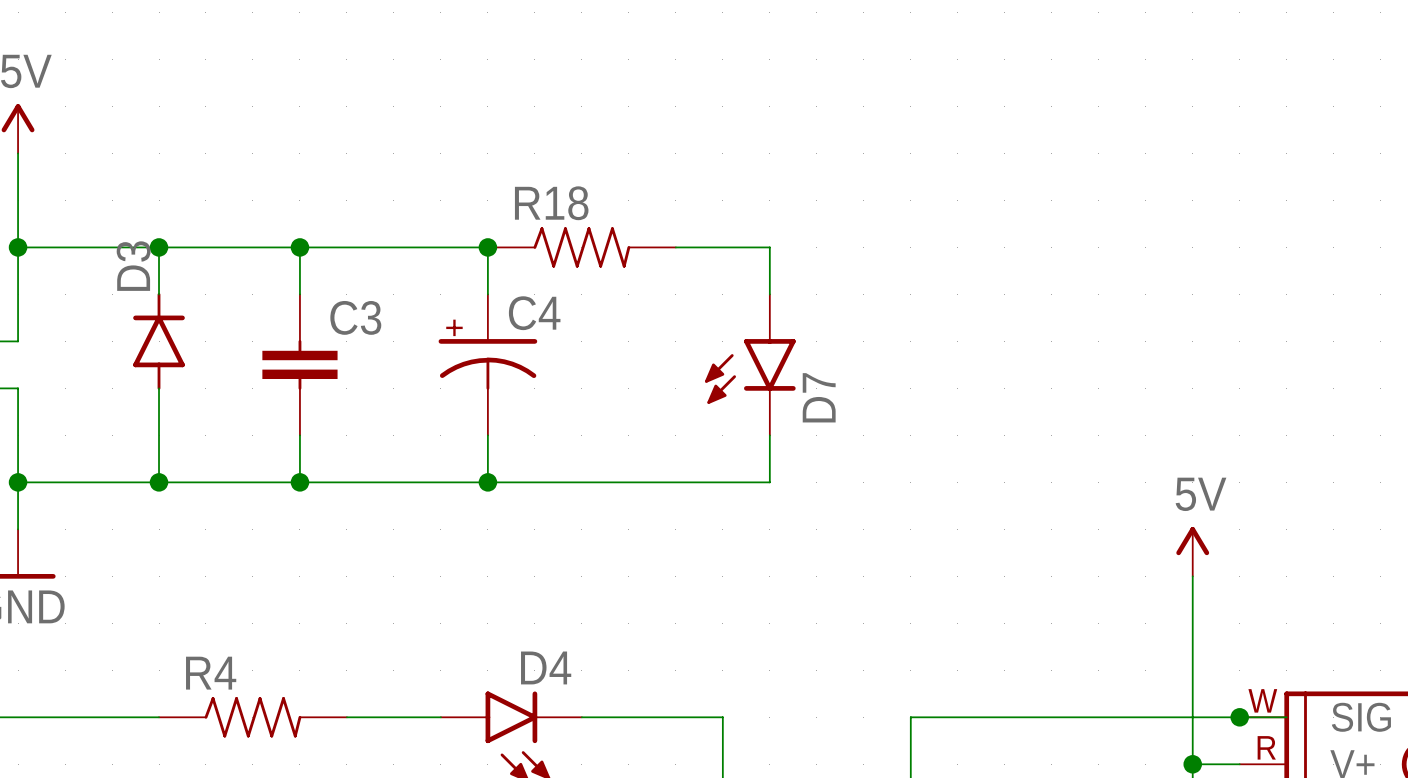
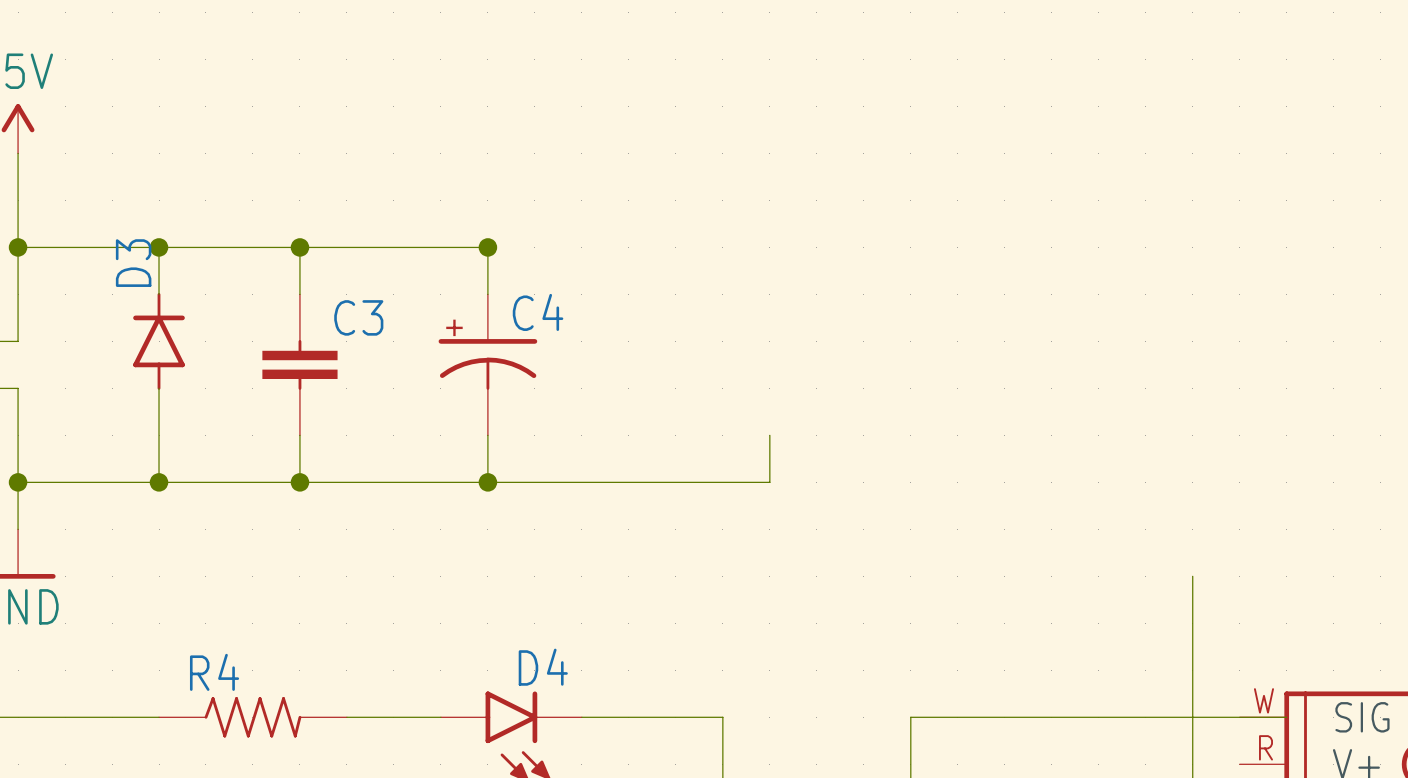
R18: (581, 247) -> none
wire: (675, 247) (769, 247) (769, 294) -> none
D7: (750, 364) -> none
power symbol: 5V (1192, 551) -> none
junction: (1239, 717) -> none
wire: (1192, 764) (1239, 764) -> none
junction: (1192, 764) -> none

